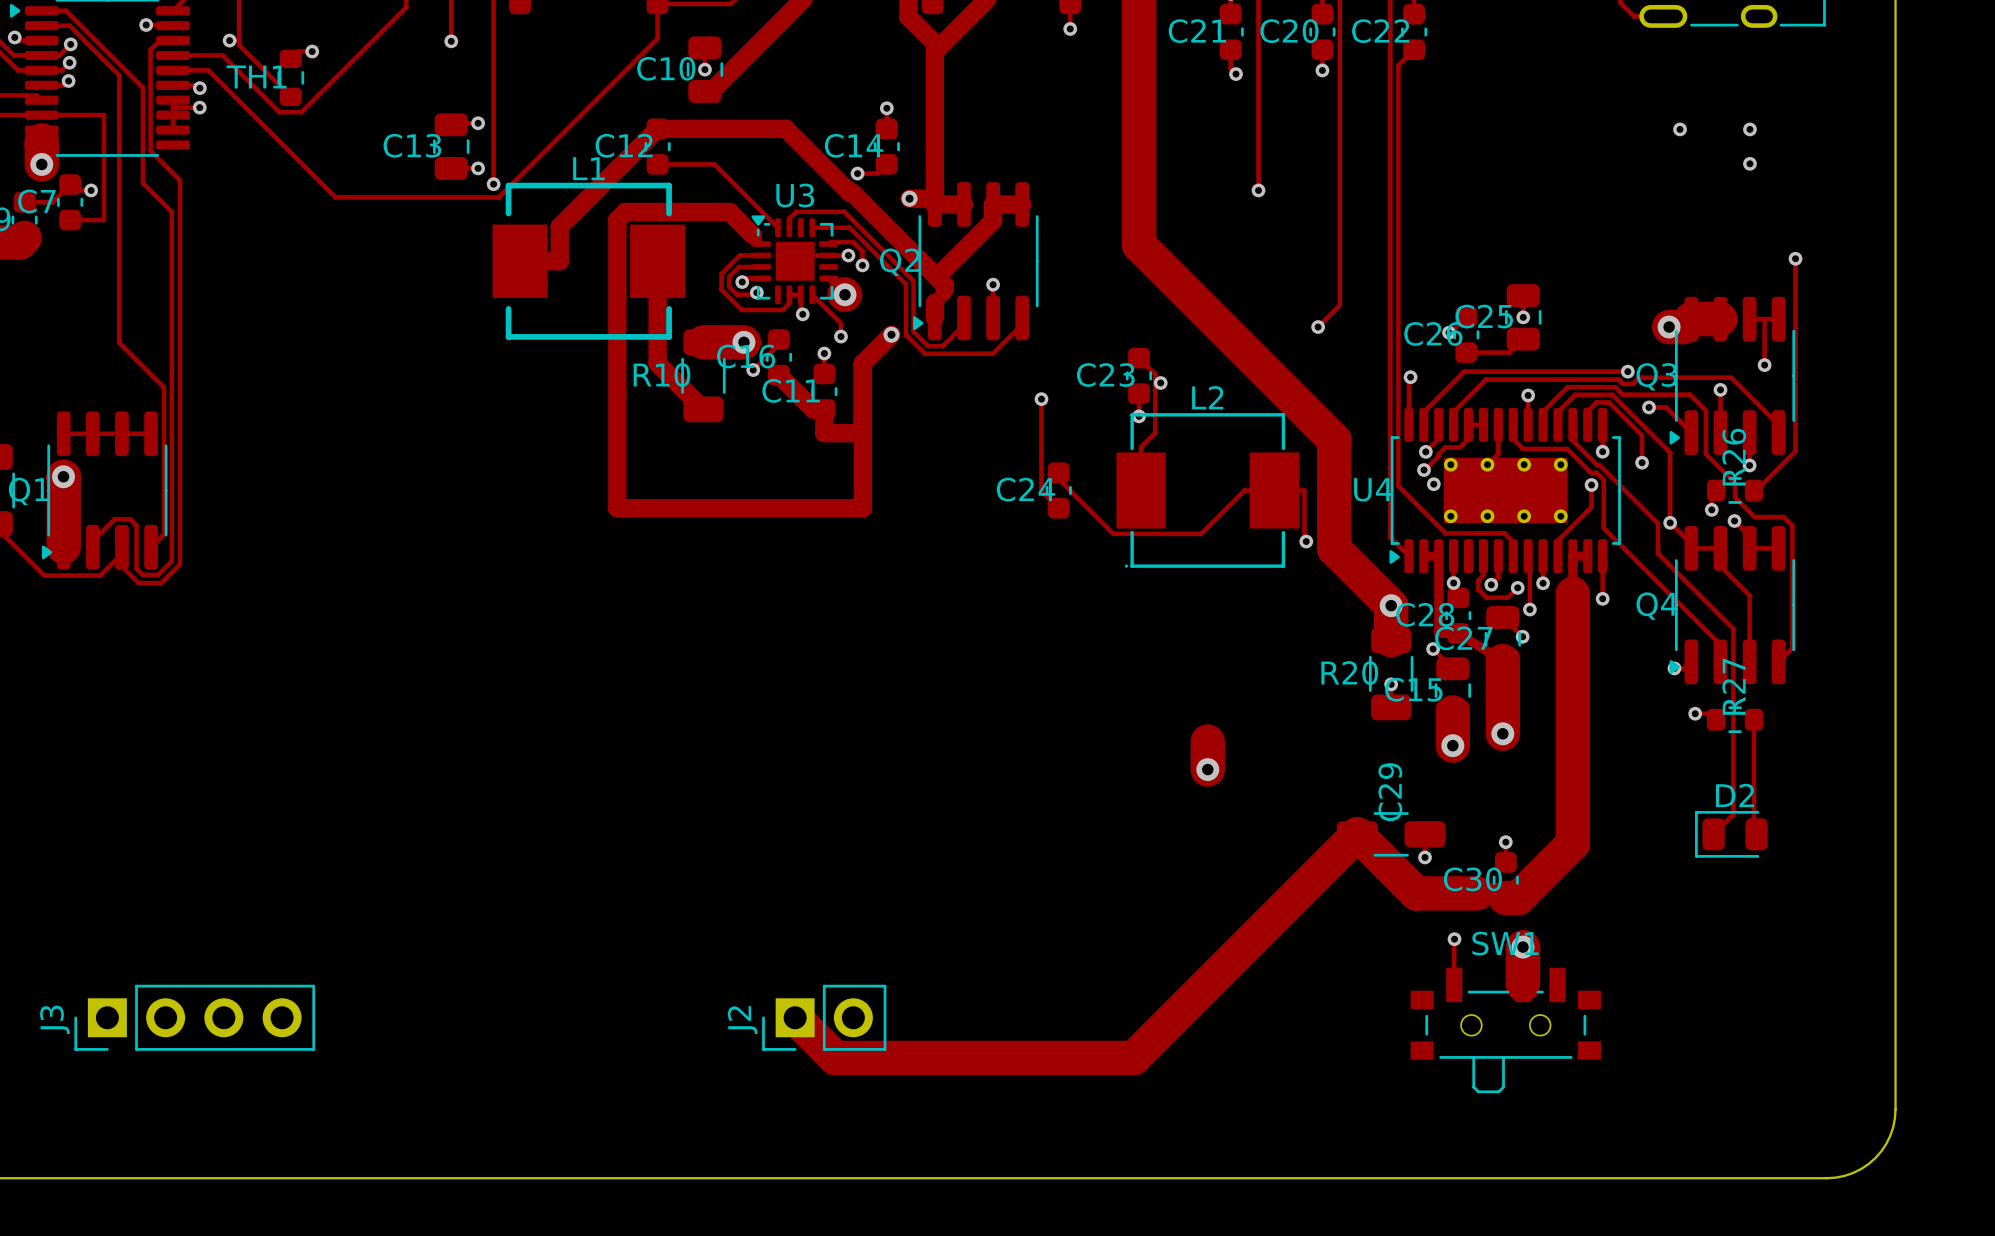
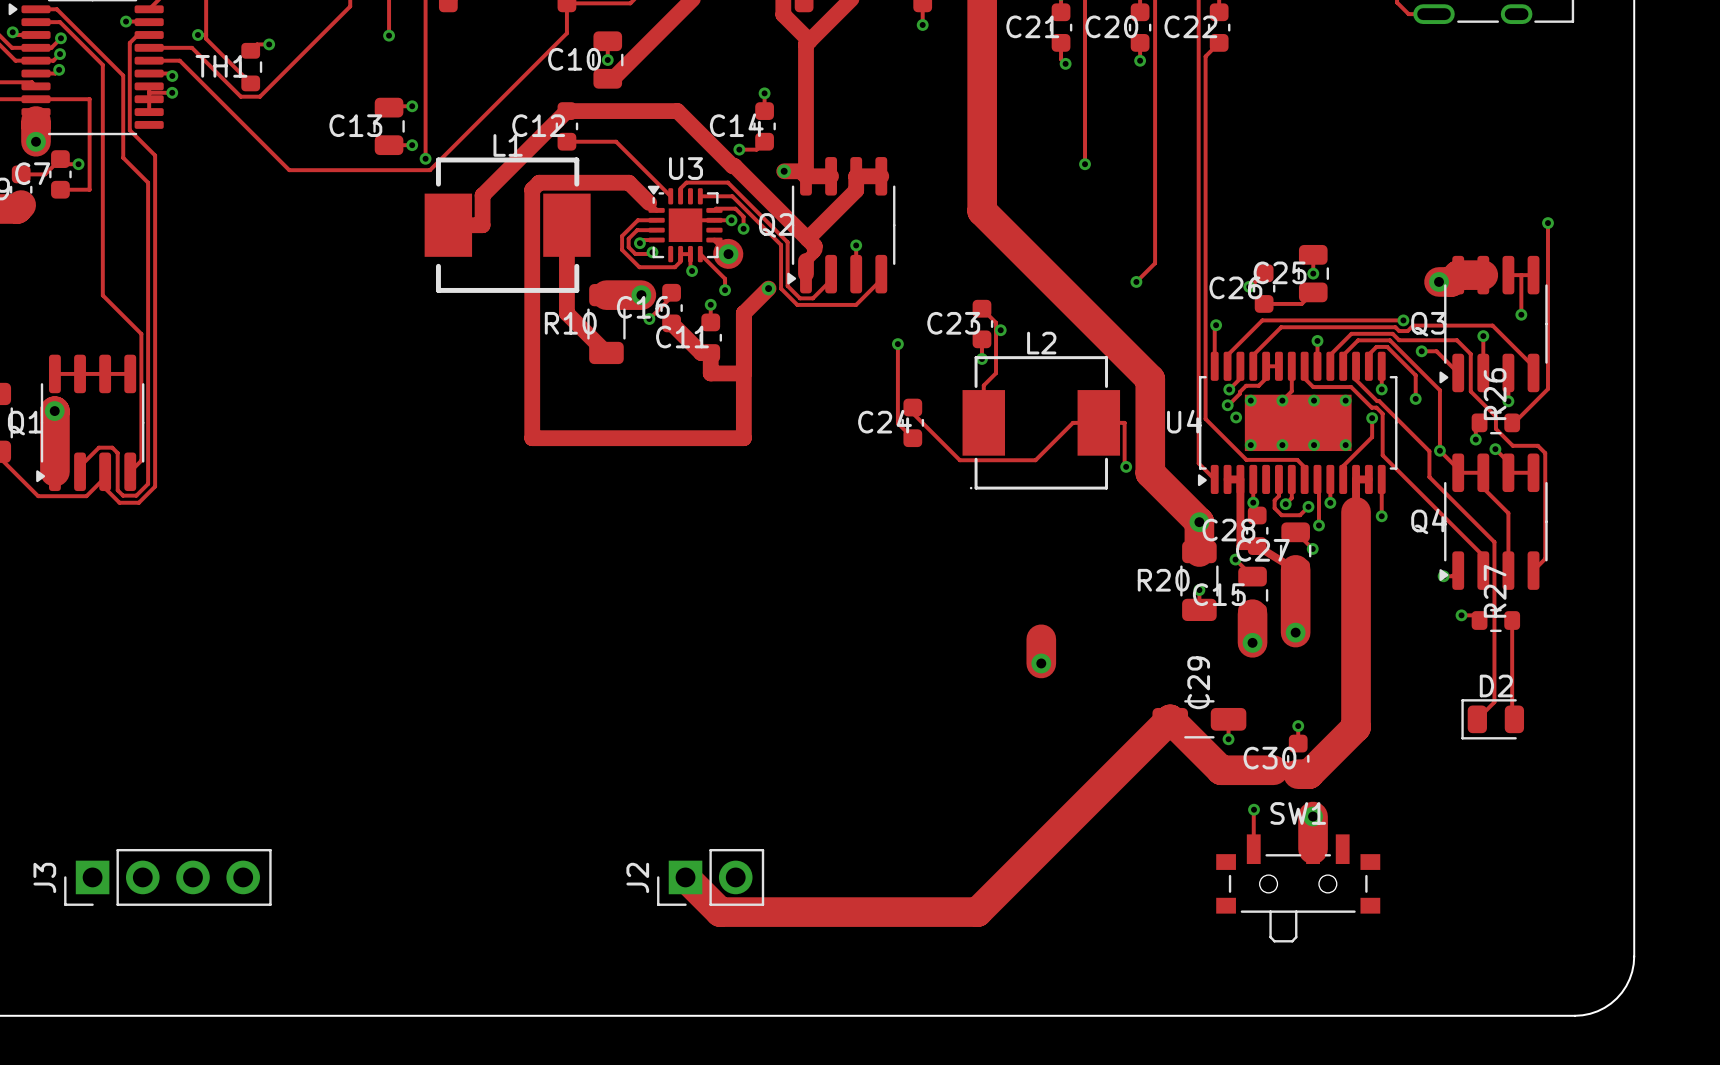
via: (1680, 129) -> none
via: (1749, 129) -> none
via: (1749, 163) -> none

